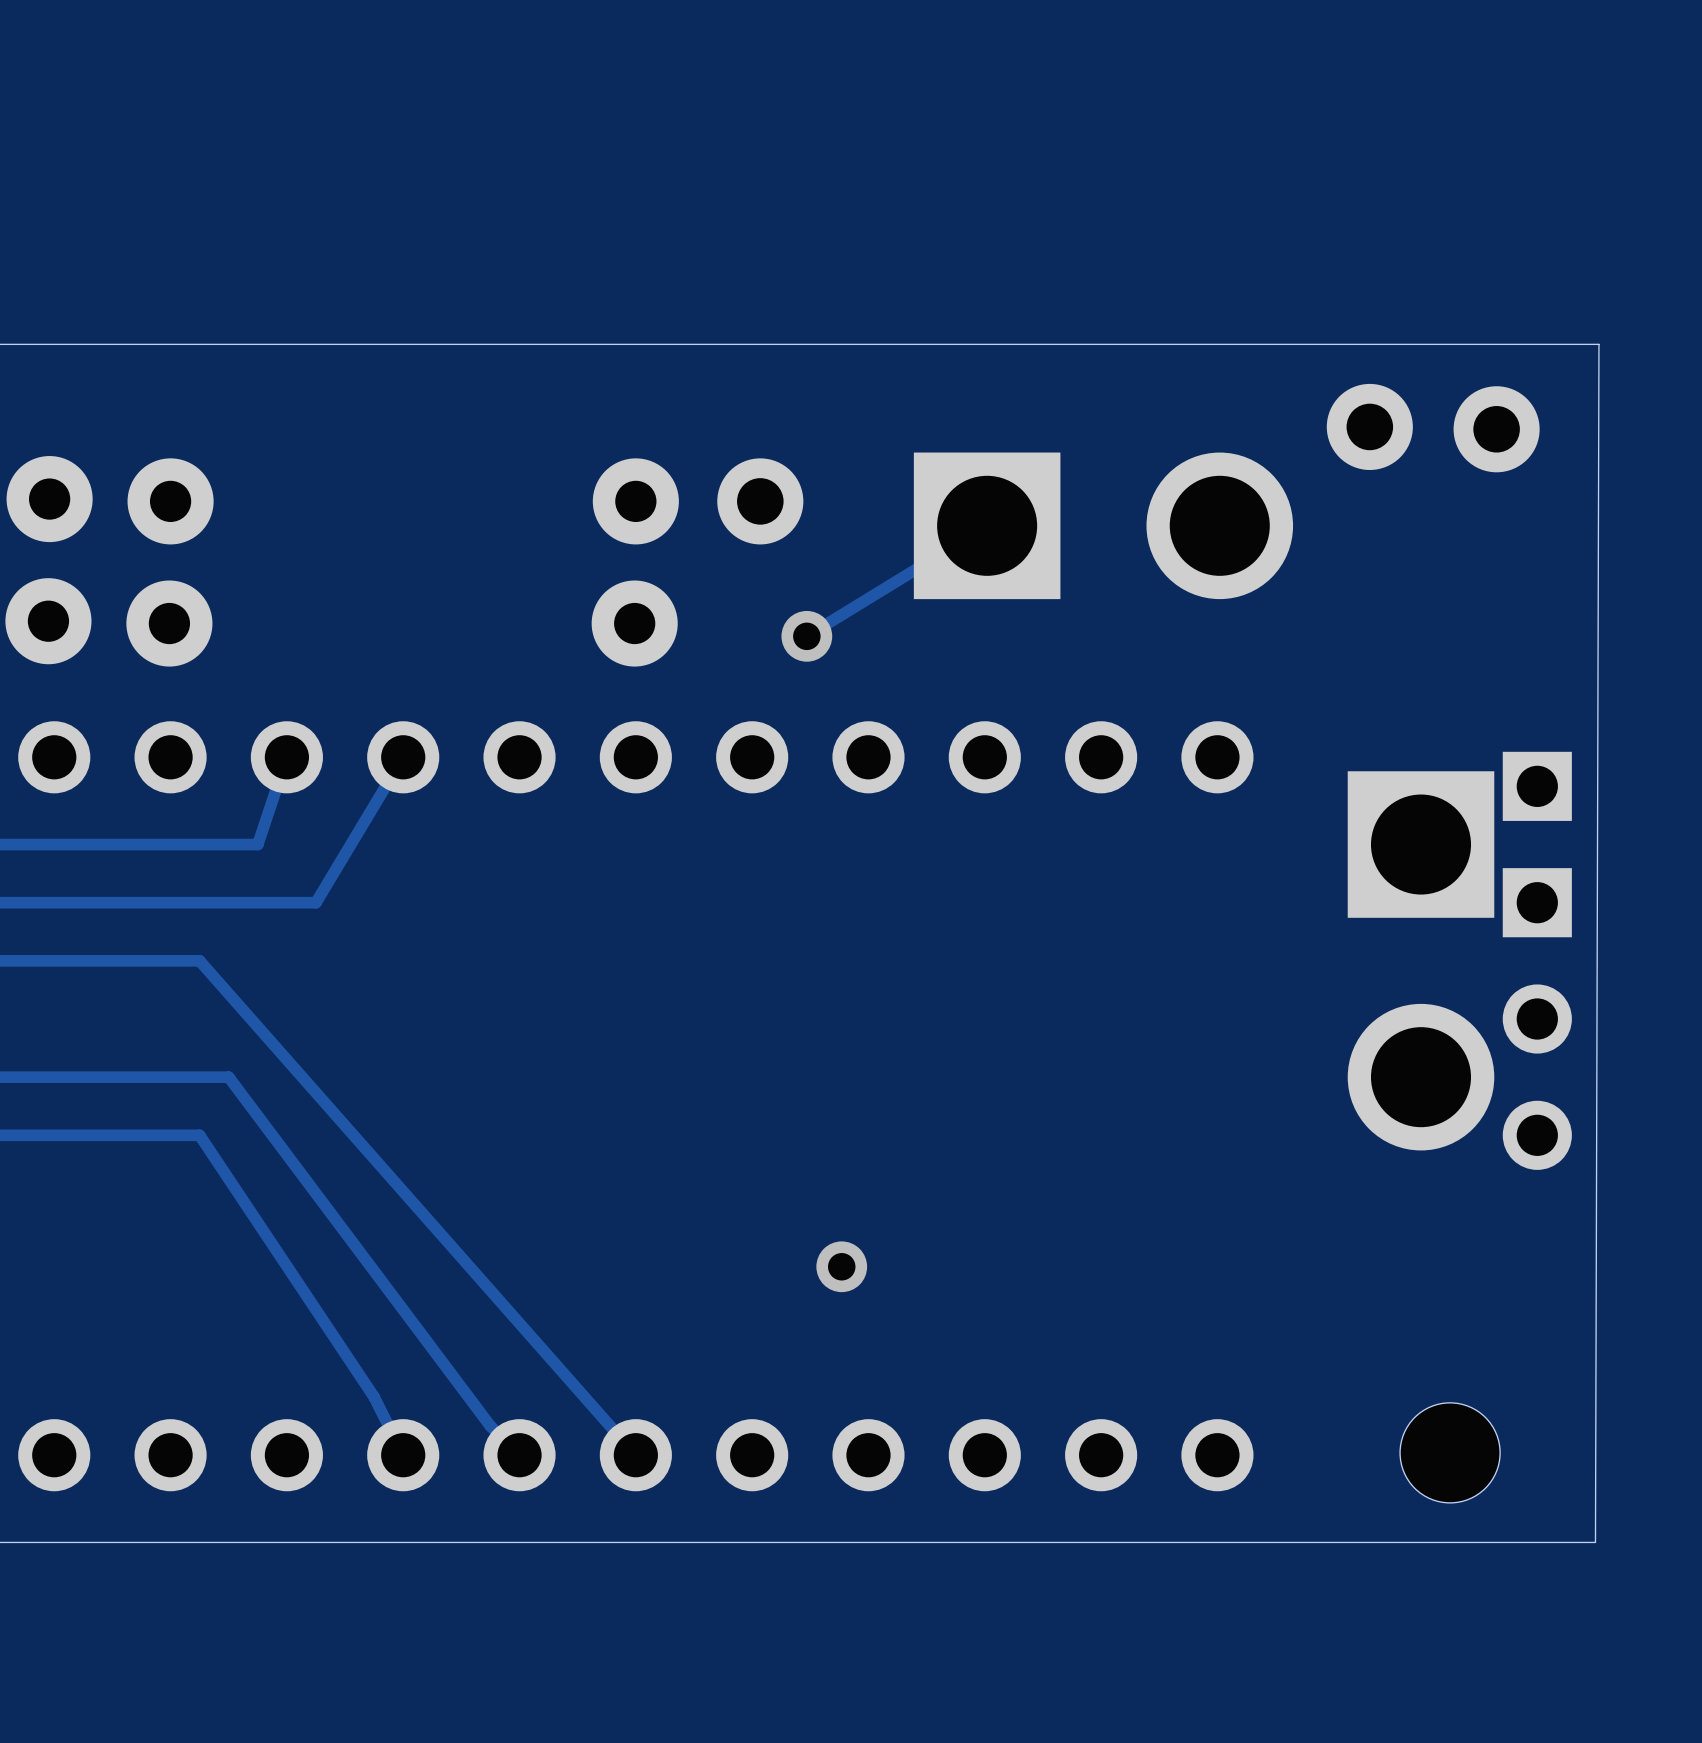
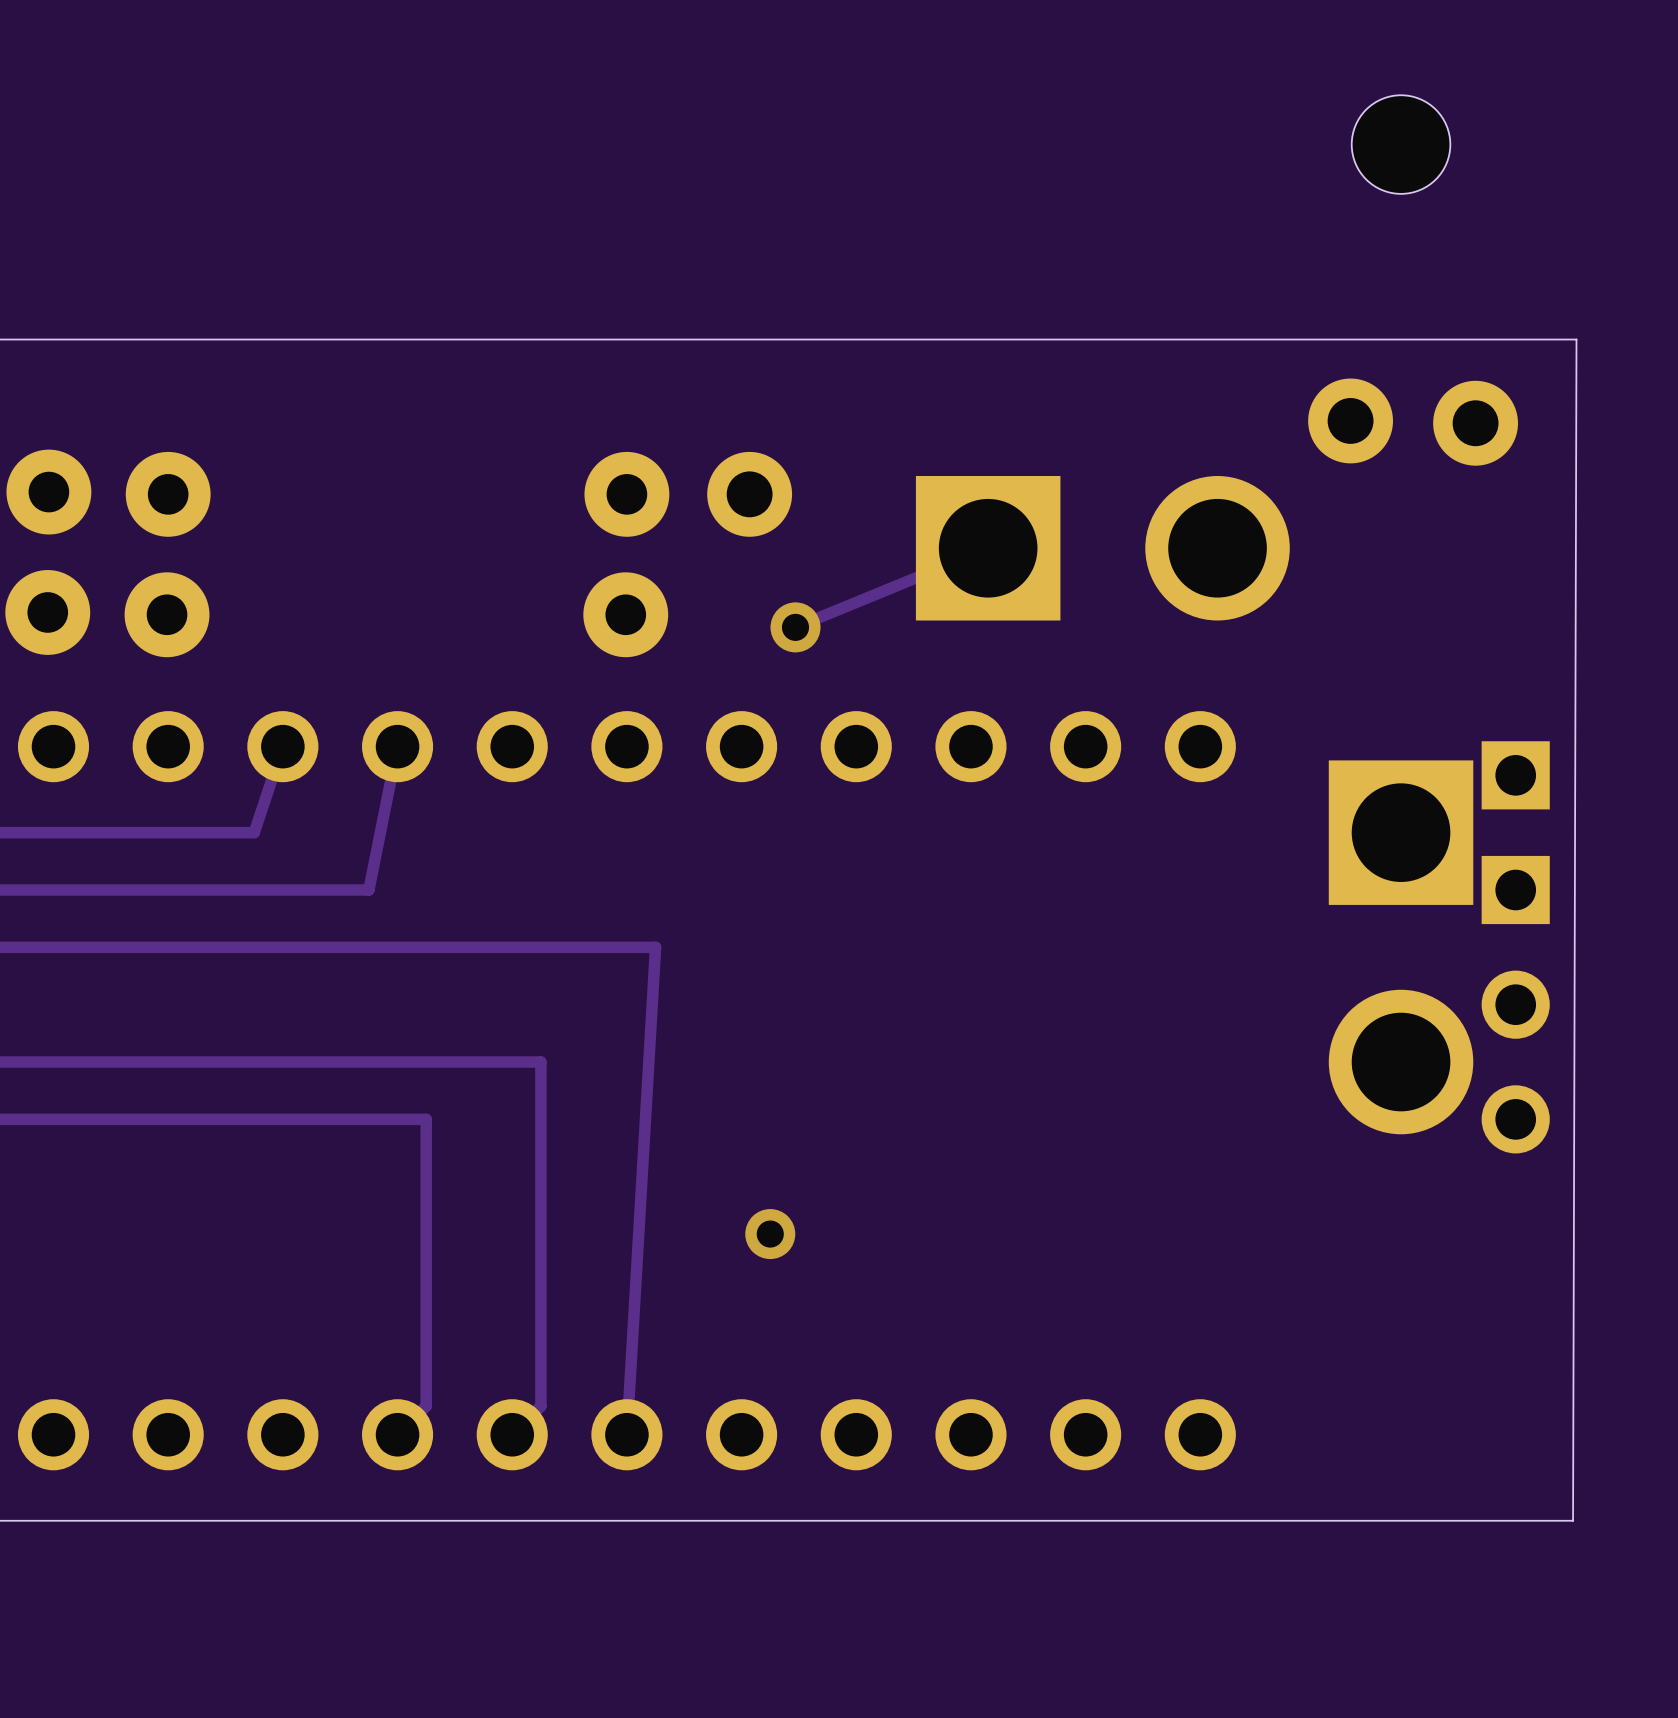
hole: none -> (1401, 144)
track: (987, 525) (806, 636) -> (988, 548) (795, 627)
part position: (1103, 525) -> (1102, 548)
track: (403, 757) (315, 902) -> (397, 746) (368, 890) (311, 890)
track: (199, 960) (635, 1455) -> (196, 947) (655, 947) (626, 1434)
track: (228, 1077) (490, 1426) (519, 1455) -> (225, 1062) (540, 1062) (540, 1406) (512, 1434)
track: (199, 1135) (374, 1397) (403, 1455) -> (196, 1119) (426, 1119) (426, 1406) (397, 1434)
via position: (841, 1266) -> (770, 1234)
hole: (1450, 1452) -> none

